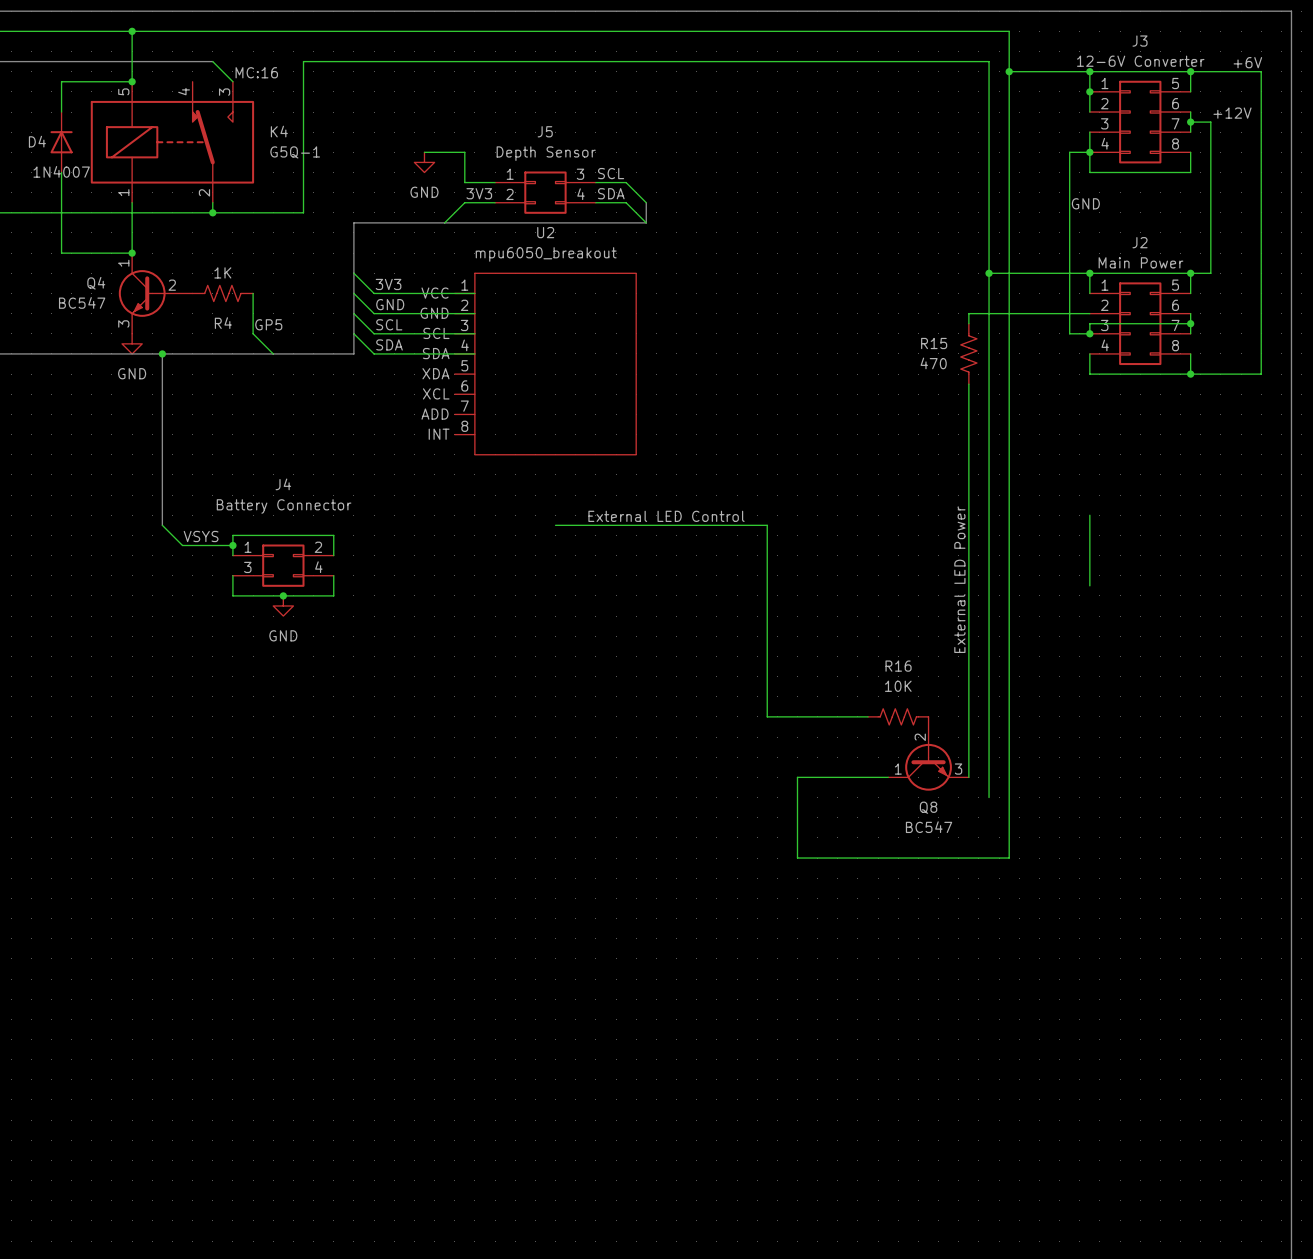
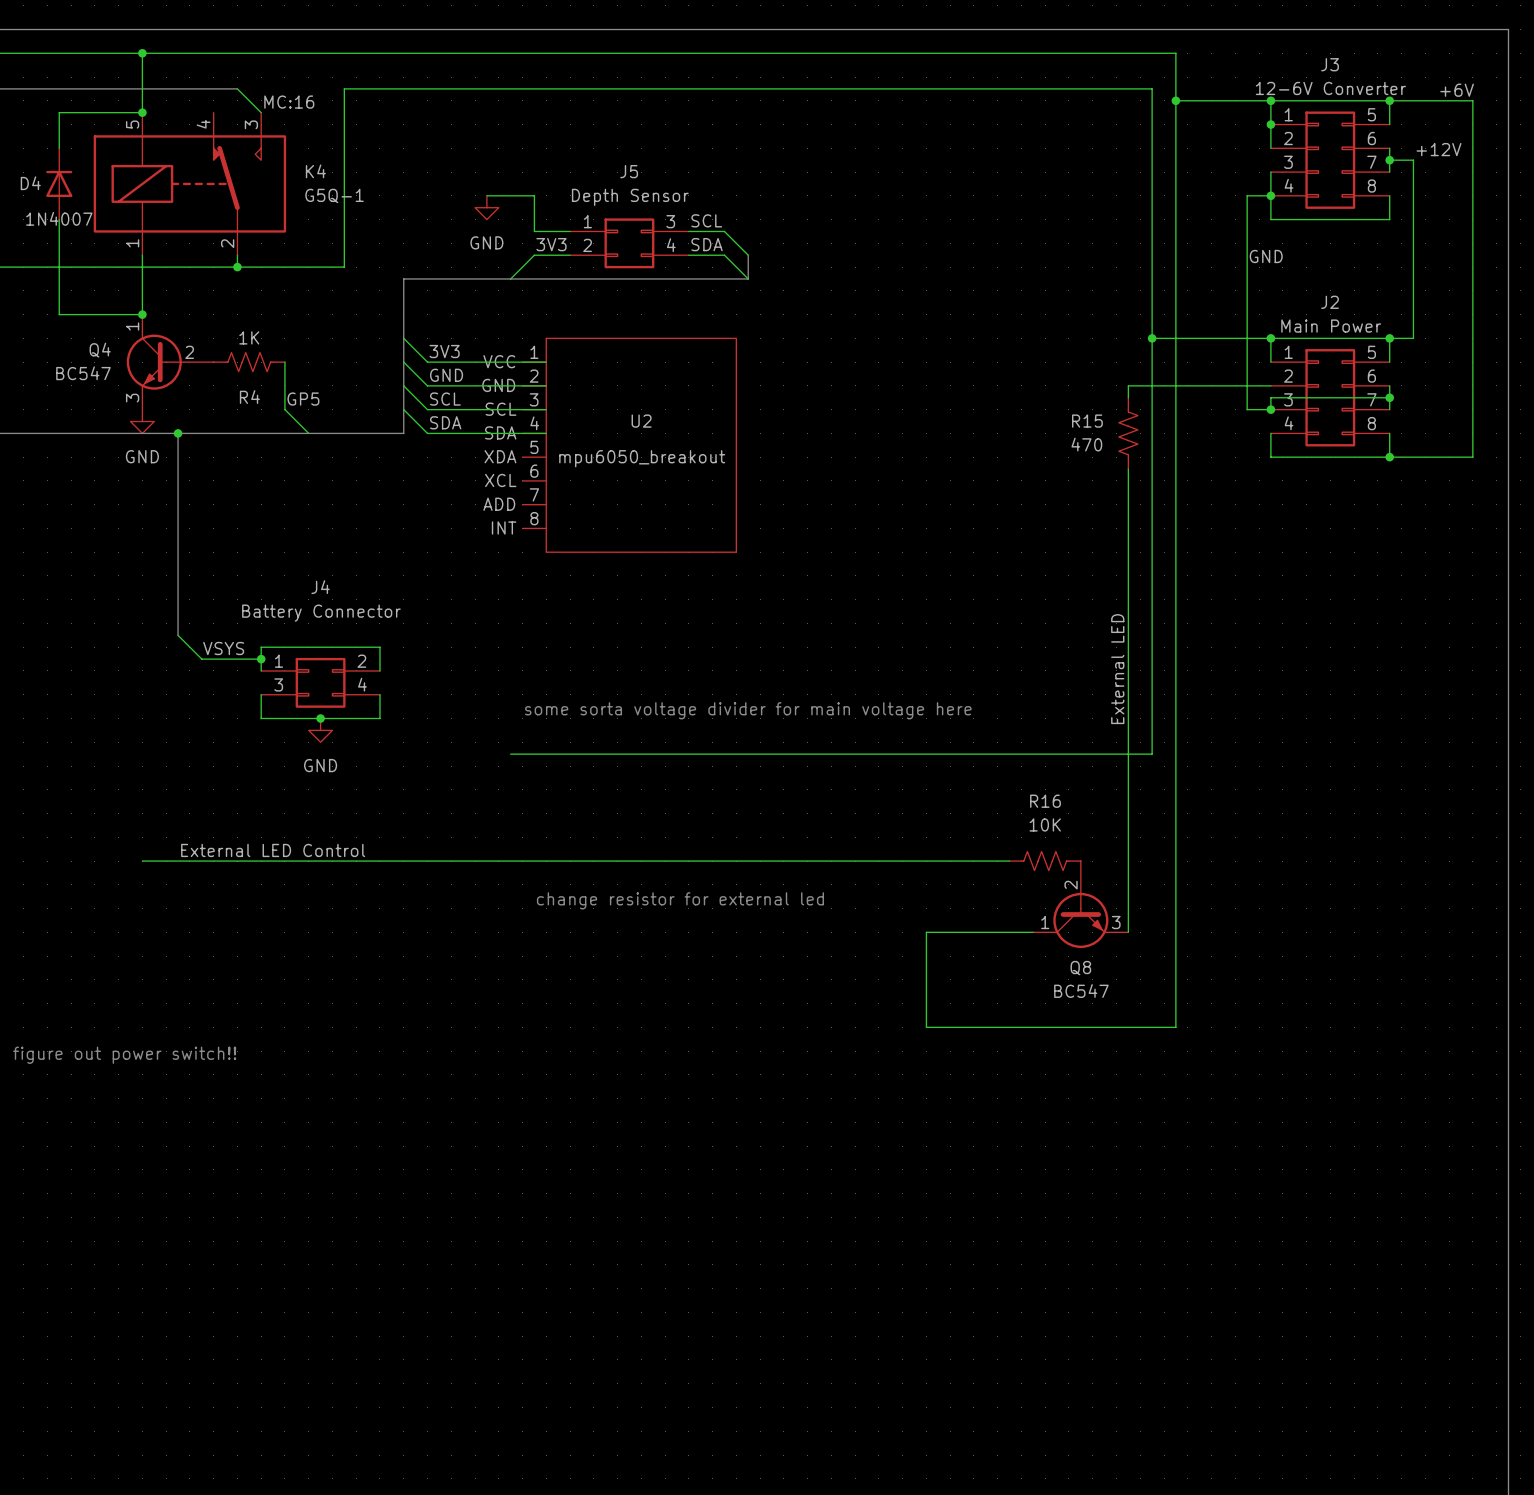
U2 name position: U2 (545, 232) -> U2 (641, 421)
U2 value position: mpu6050_breakout (546, 254) -> mpu6050_breakout (642, 458)
wire: (1089, 515) (1089, 585) -> none
label: External LED Control (666, 516) -> none
wire: (555, 525) (767, 525) (767, 716) -> (142, 861) (890, 861)
label: External LED Power (959, 579) -> External LED (1117, 669)
text: none -> some sorta voltage divider for main voltage here (748, 710)
wire: (989, 626) (989, 797) -> (1152, 754) (510, 754)
label: none -> External LED Control (273, 850)
text: none -> change resistor for external led (680, 900)
text: none -> figure out power switch!! (124, 1055)

